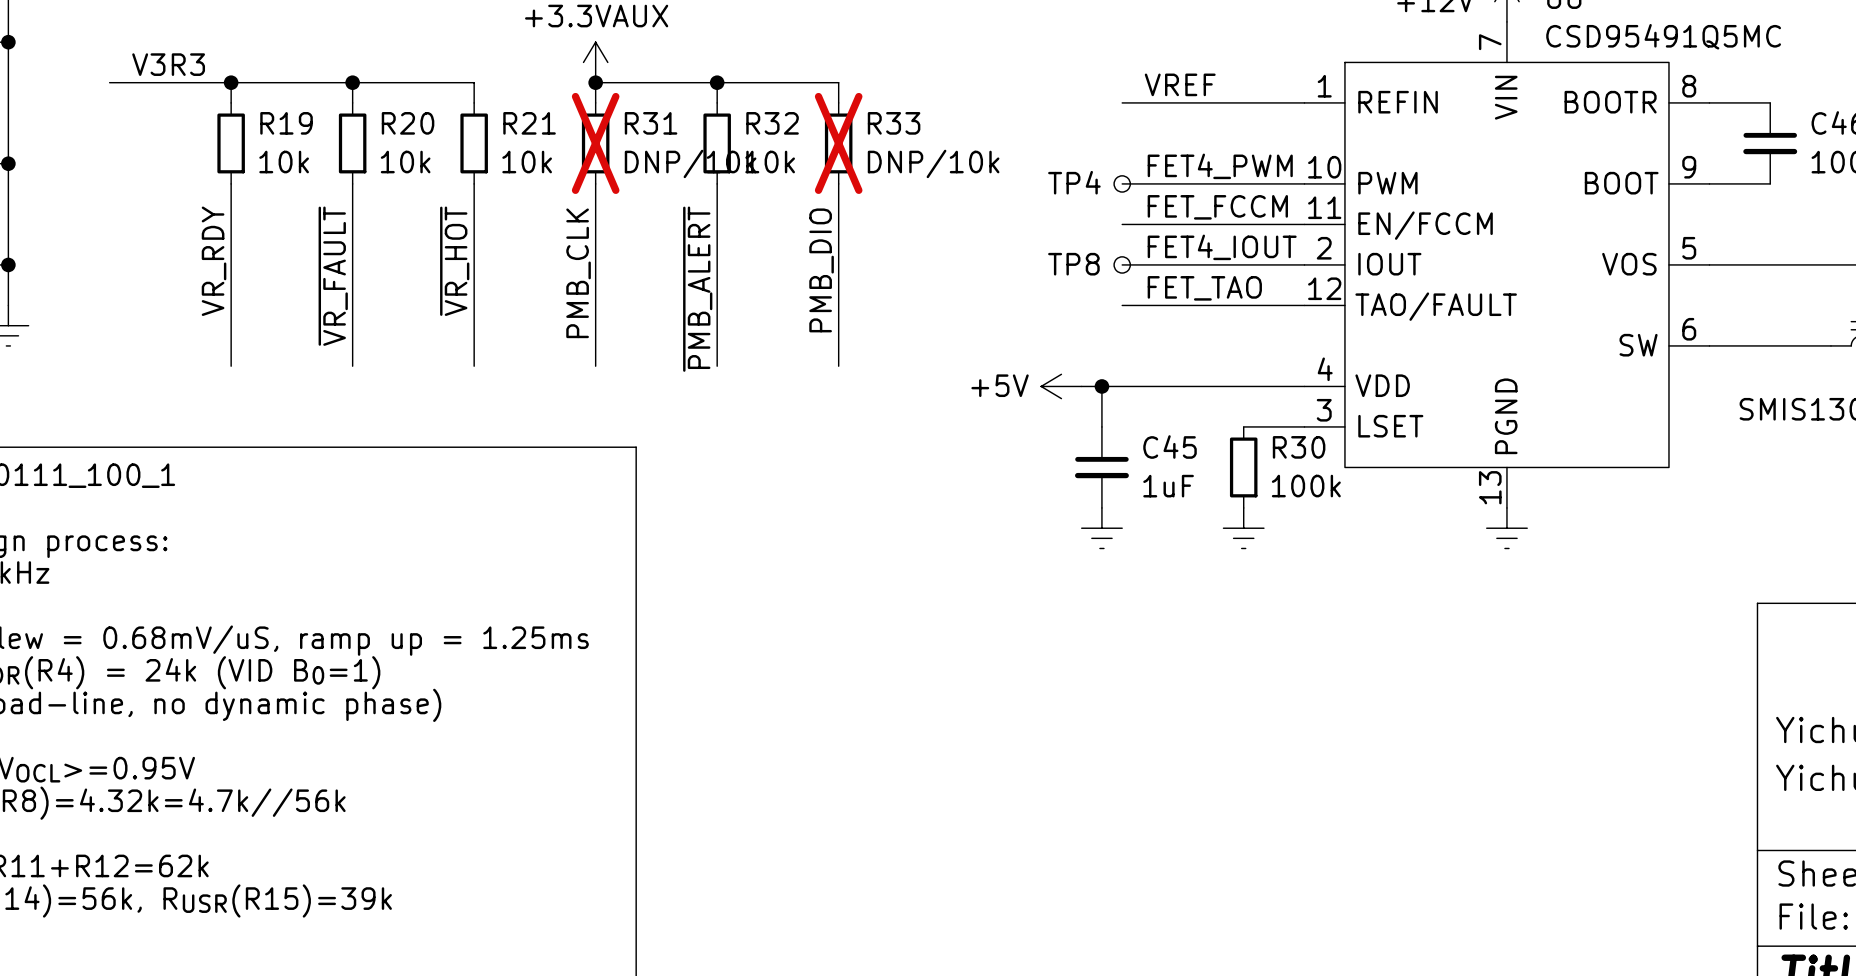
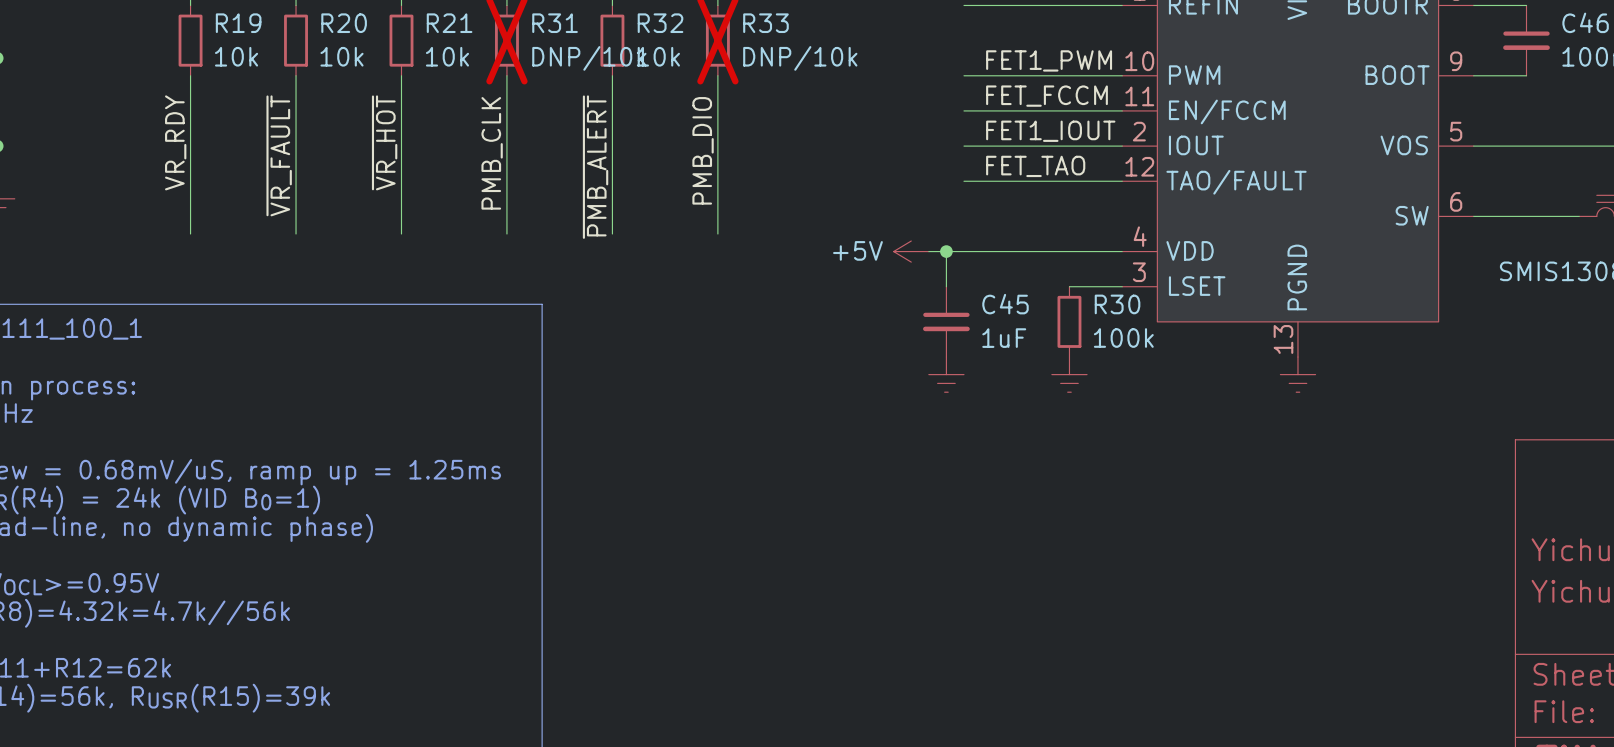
label: FET4_PWM (1220, 166) -> FET1_PWM (1049, 60)
TP4: (1122, 183) -> none
label: FET4_IOUT (1222, 247) -> FET1_IOUT (1050, 131)
TP8: (1122, 264) -> none

